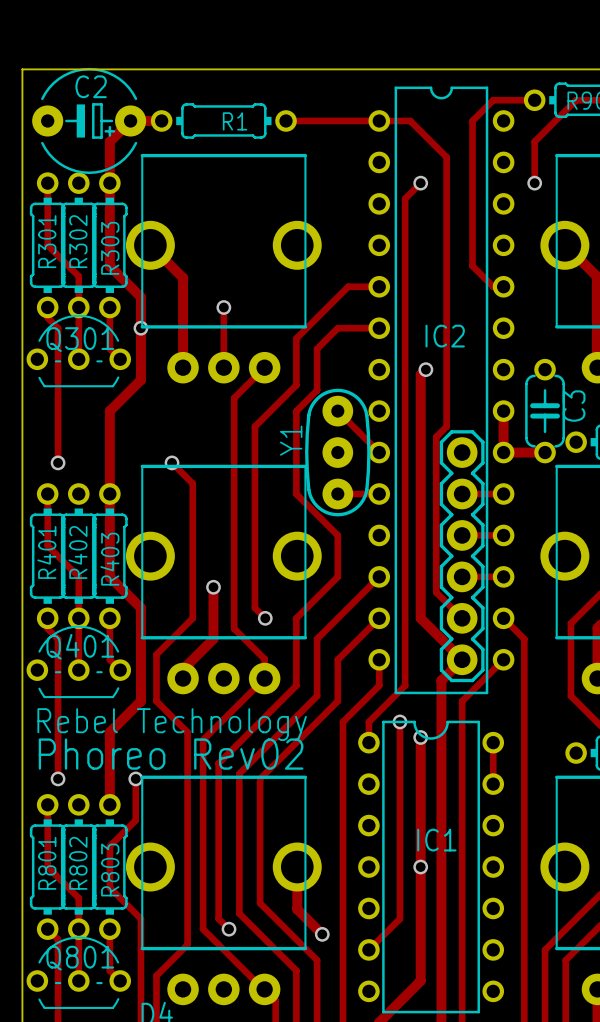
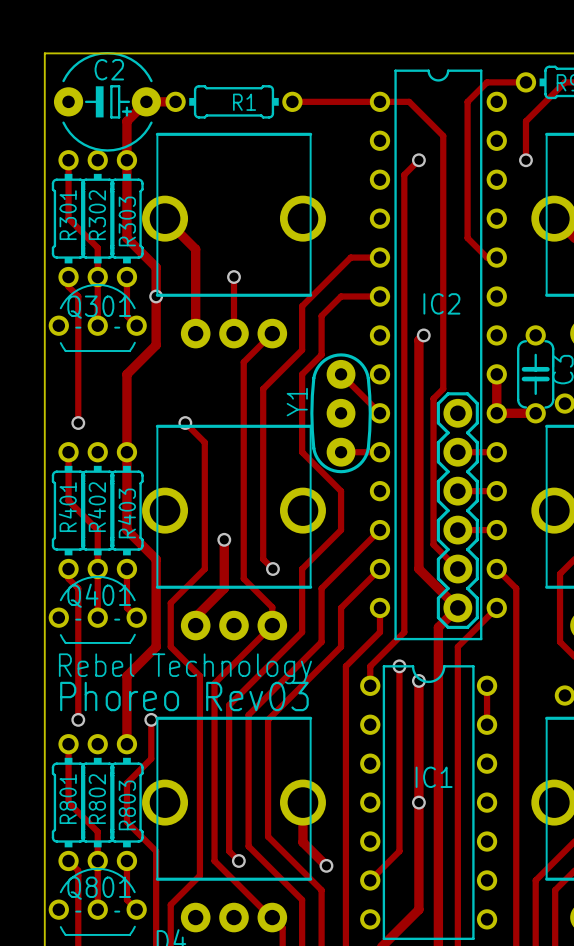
text: Phoreo Rev02 (171, 754) -> Phoreo Rev03 (184, 696)

